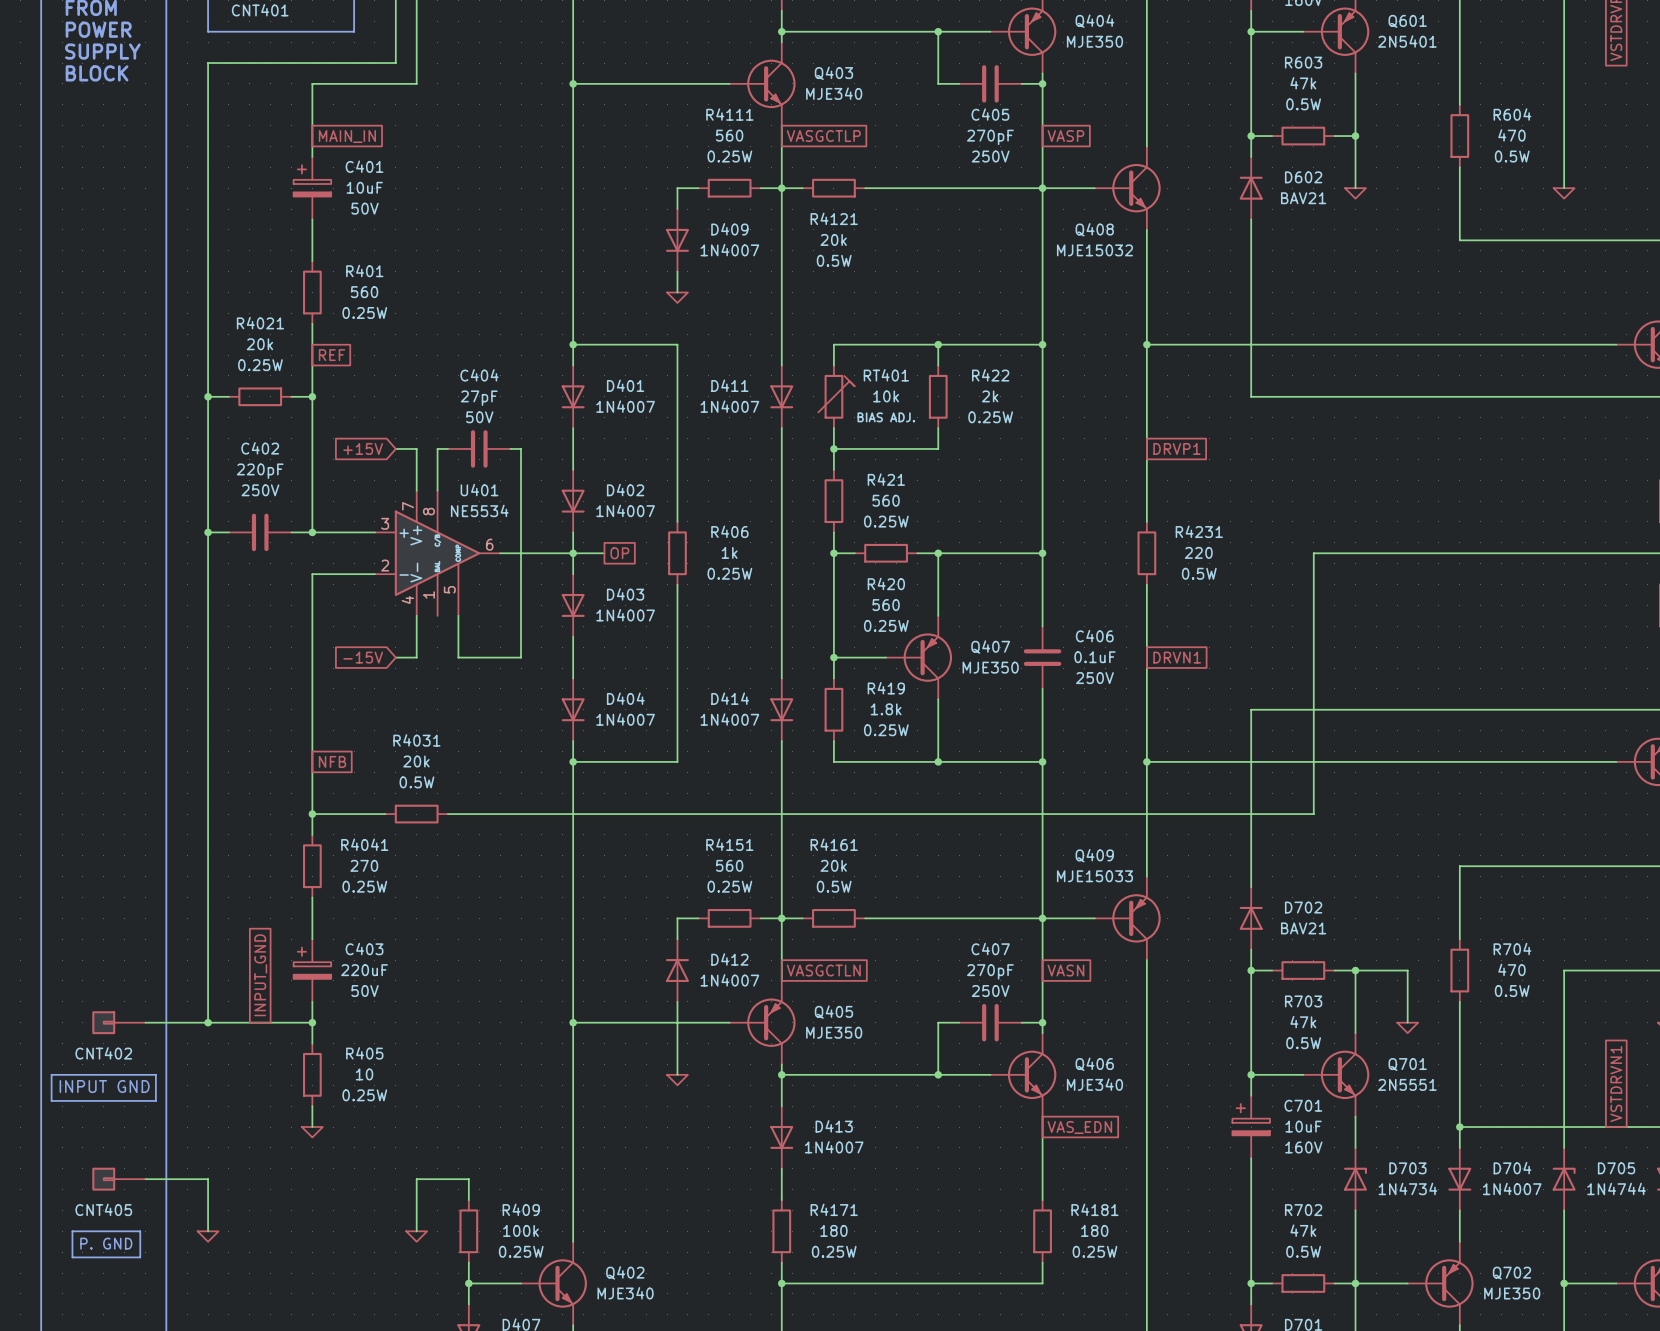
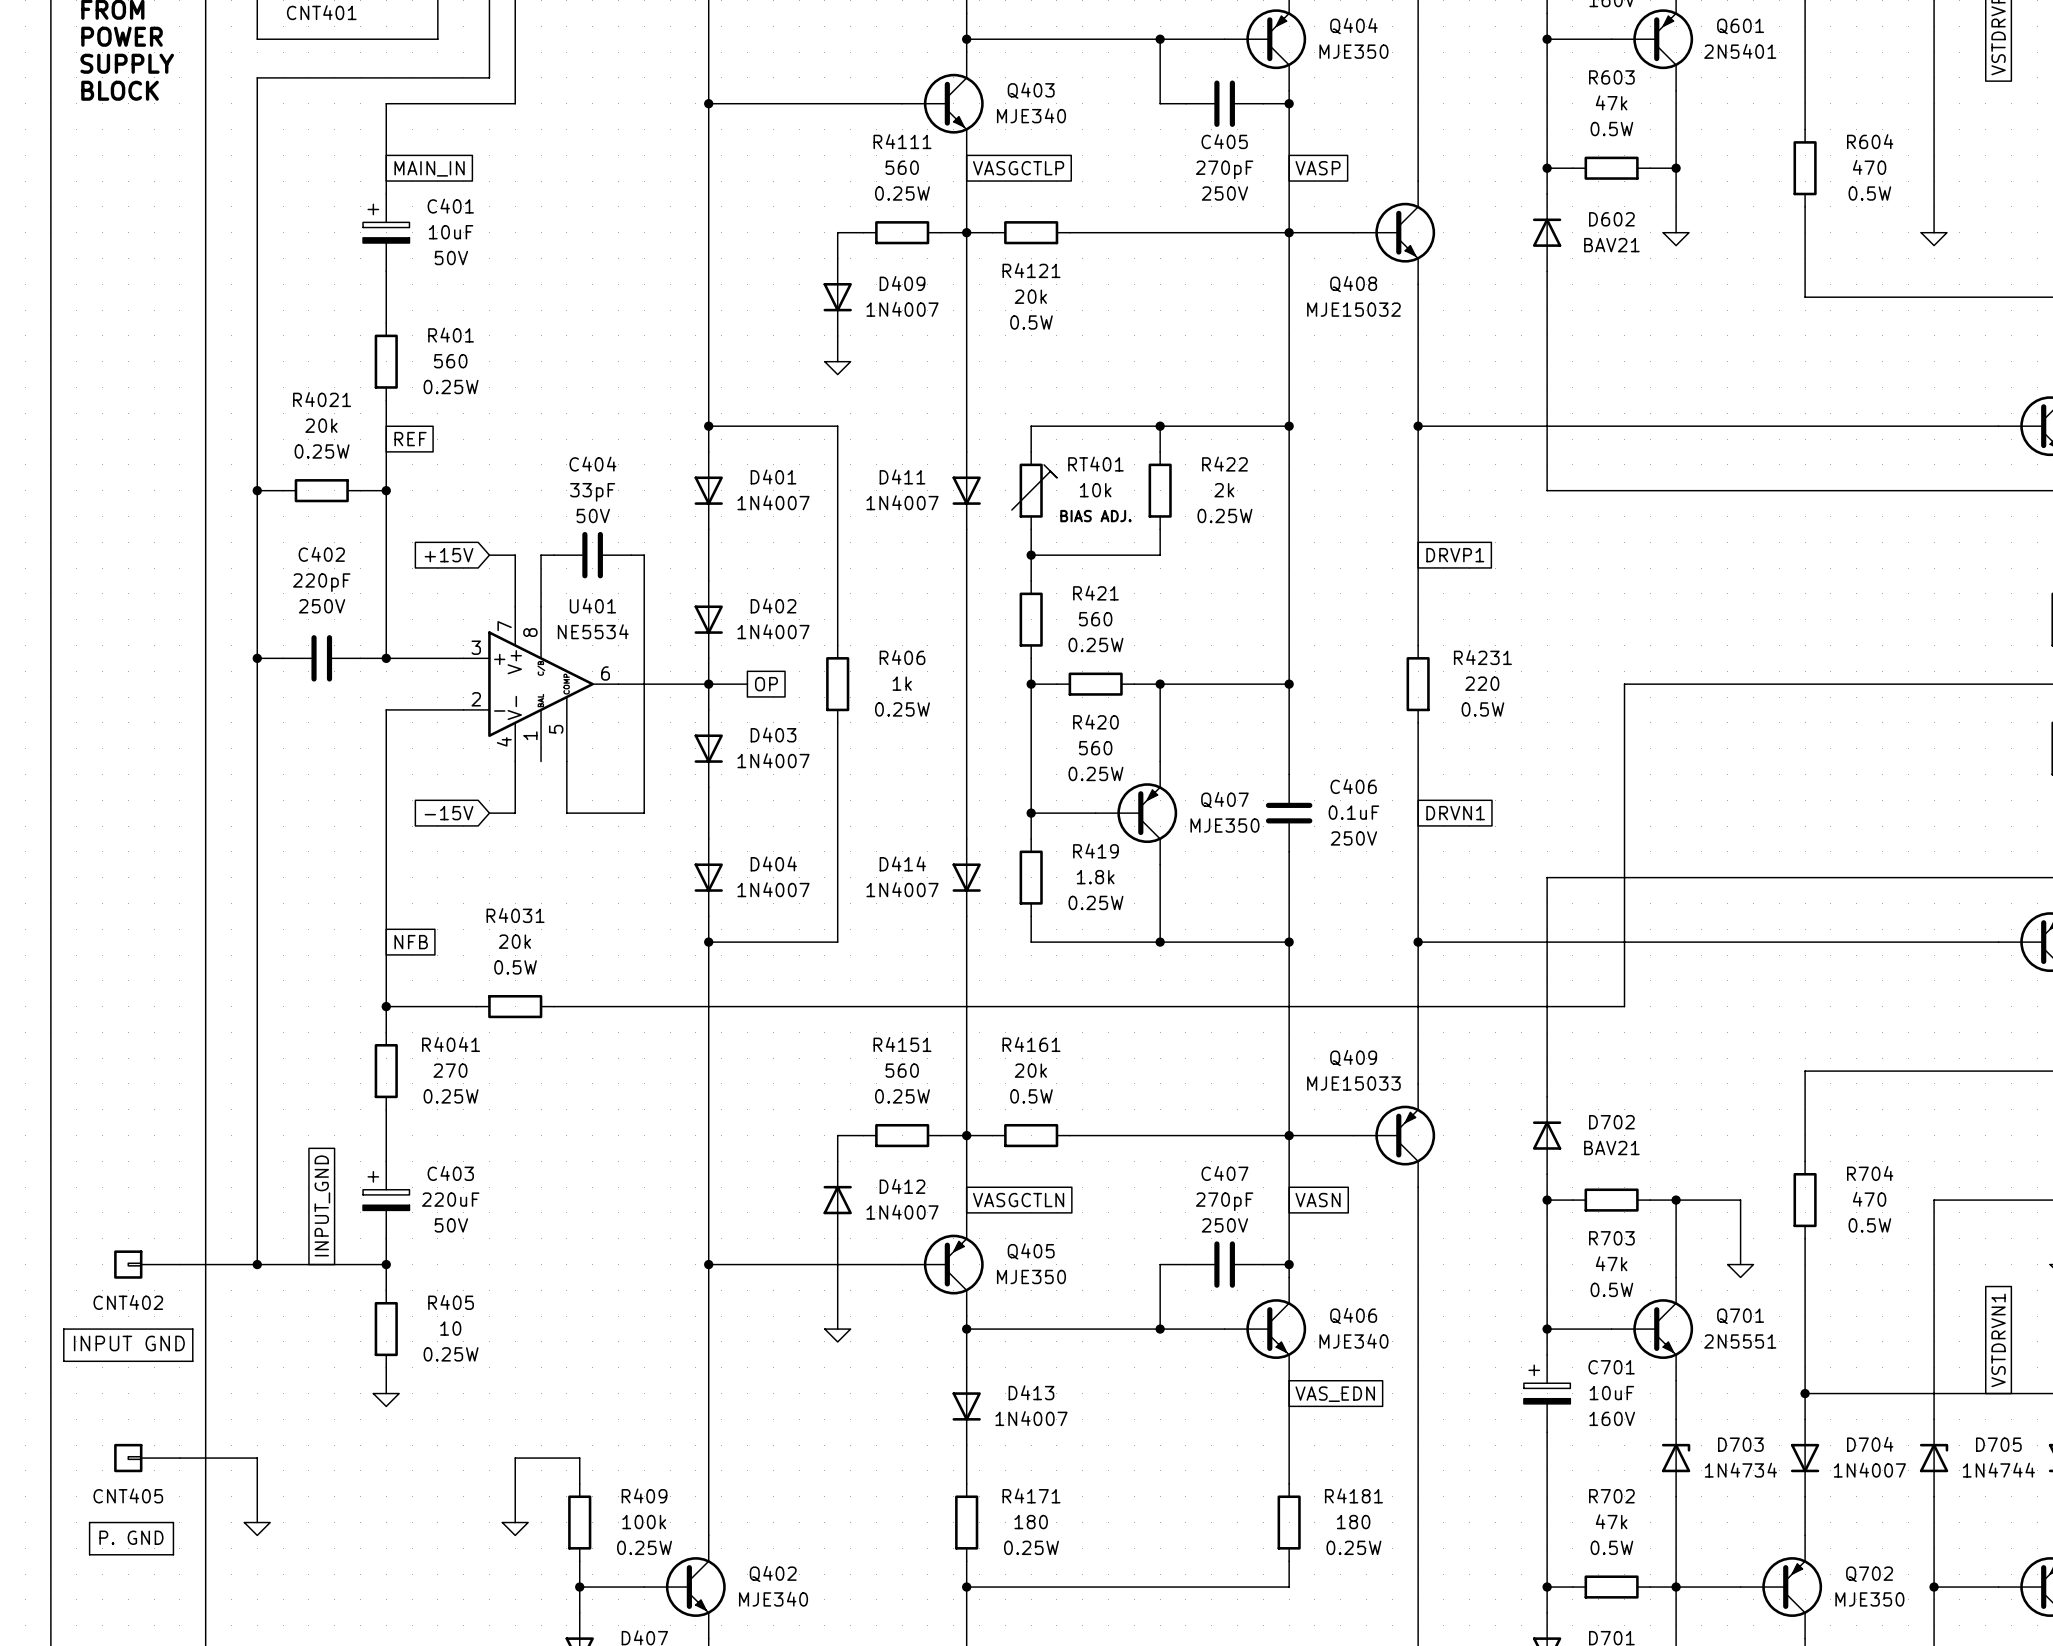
C404 value: 27pF (479, 398) -> 33pF (592, 492)

